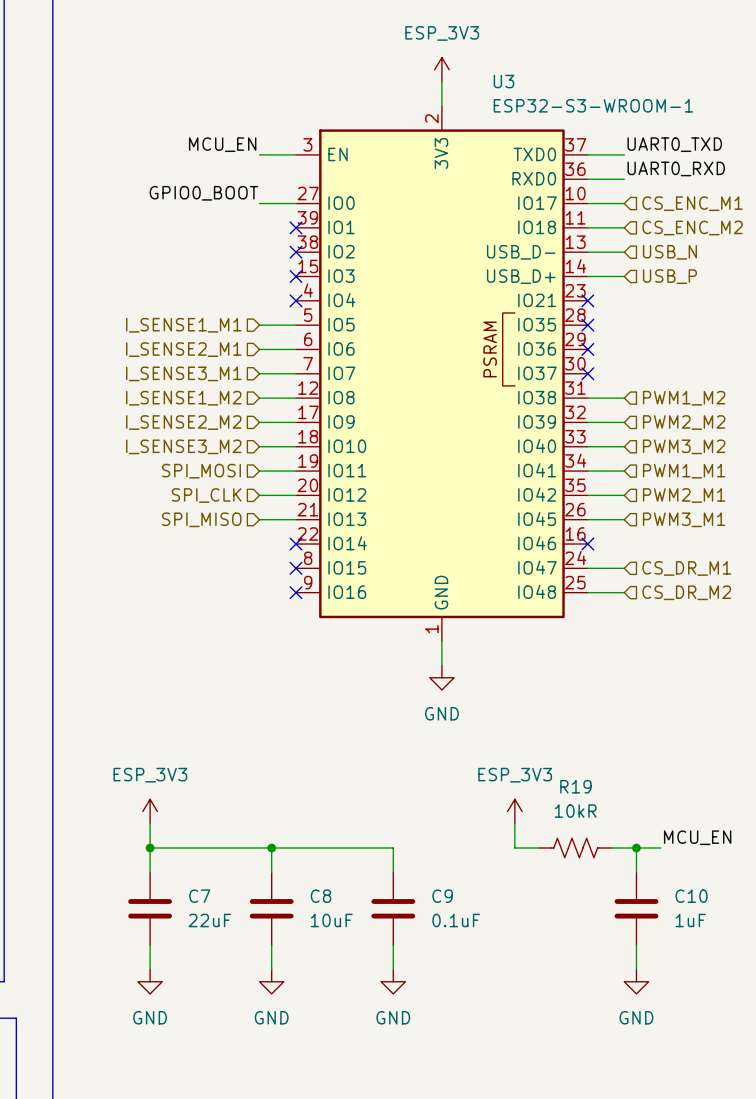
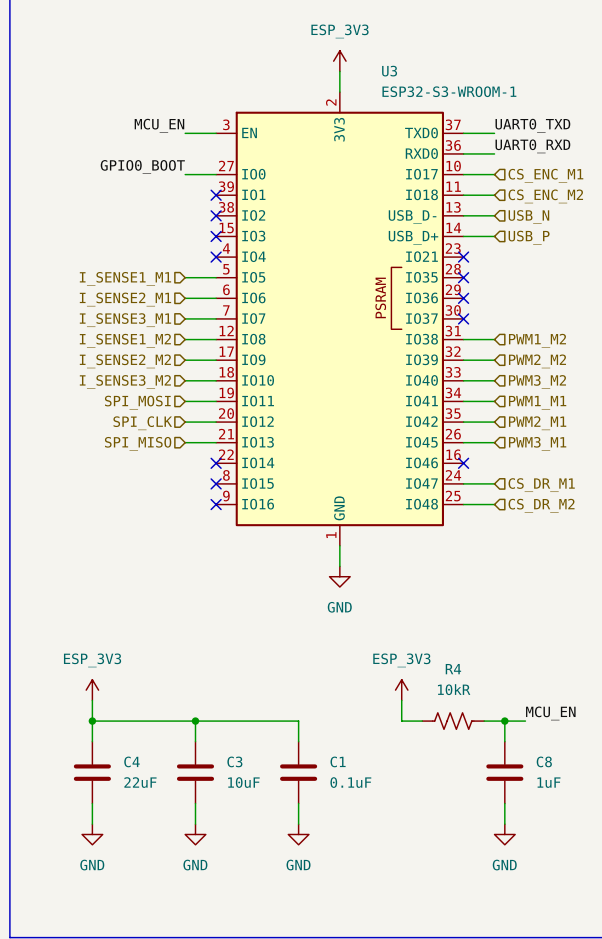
R19 name: R19 (575, 786) -> R4 (453, 669)
C7 name: C7 (199, 896) -> C4 (131, 761)
C8 name: C8 (320, 896) -> C3 (234, 761)
C9 name: C9 (442, 896) -> C1 (338, 761)
C10 name: C10 (691, 896) -> C8 (544, 761)

